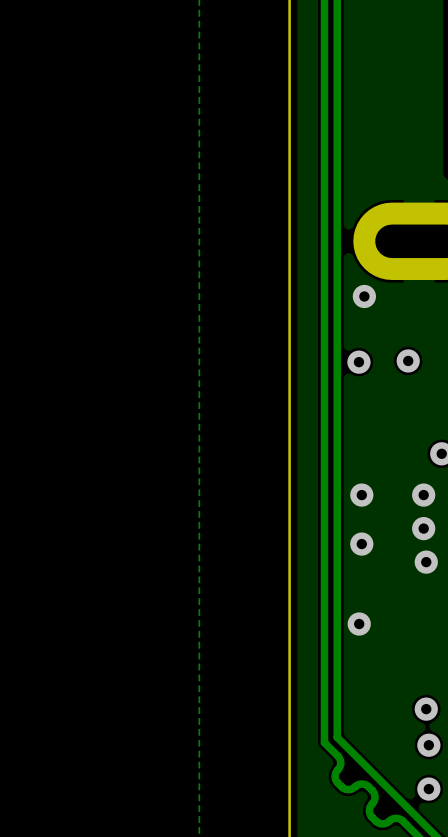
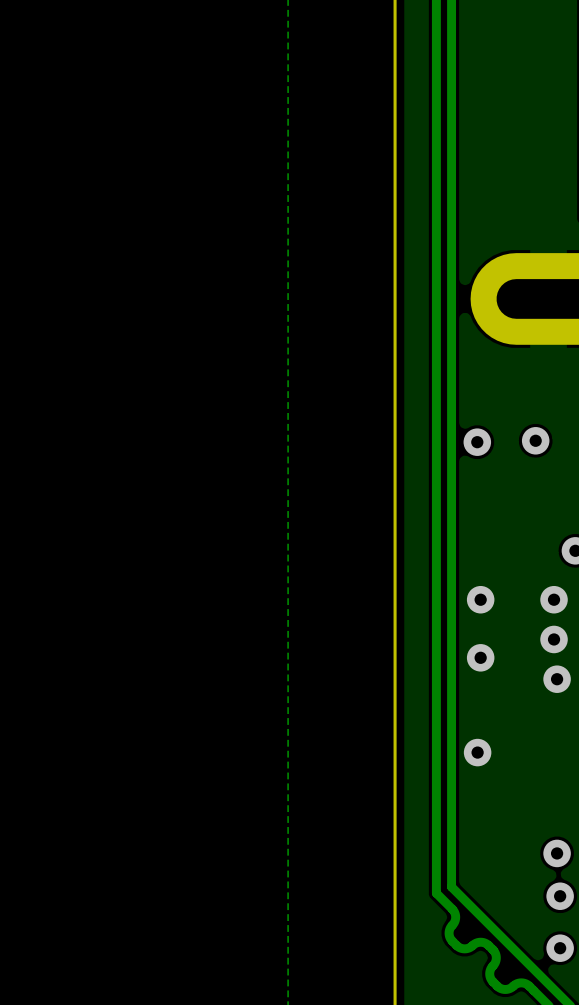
via: (364, 296) -> none

